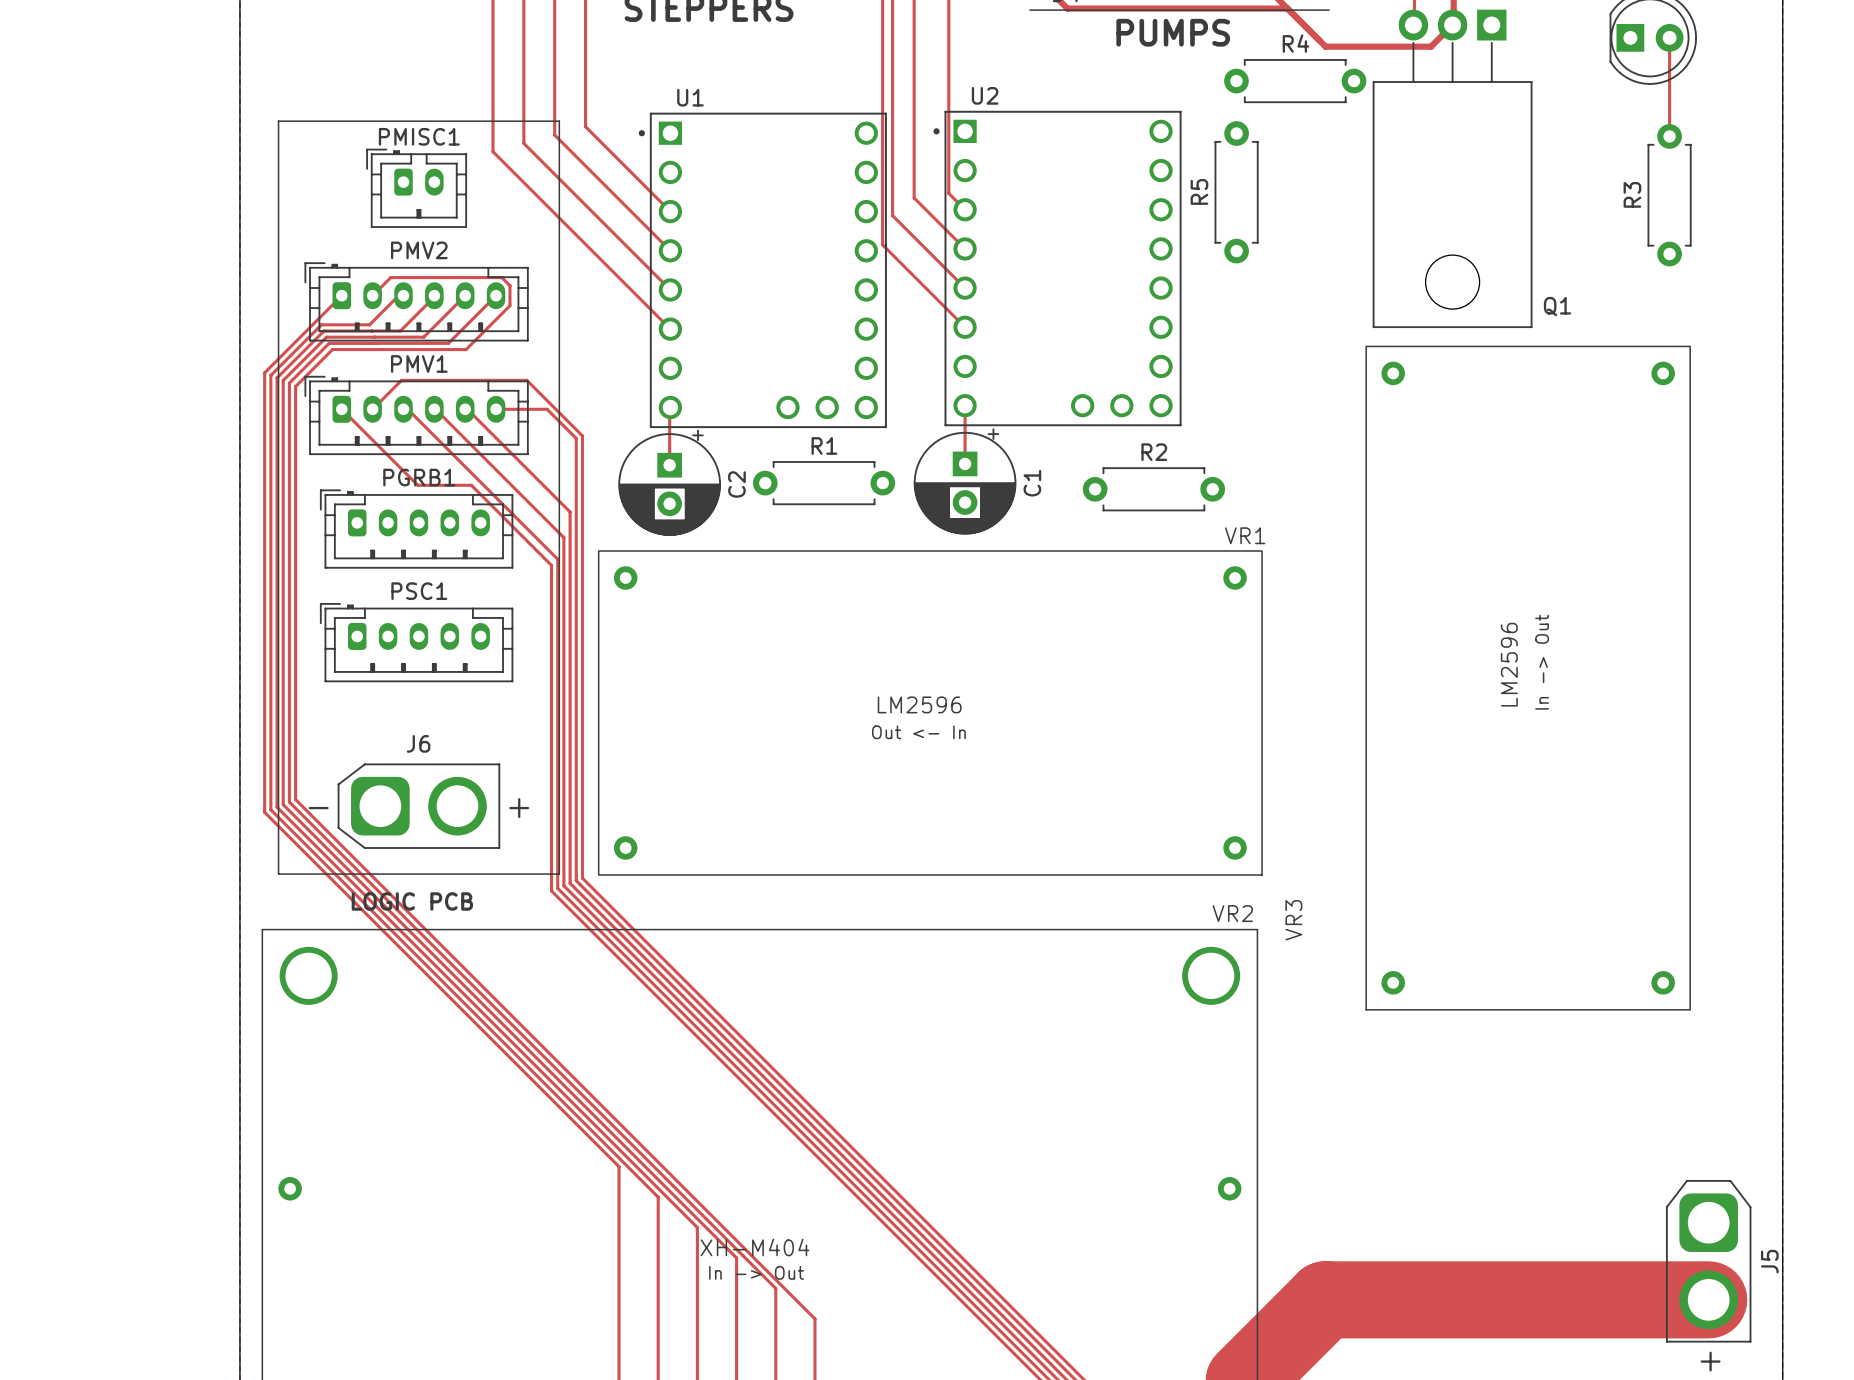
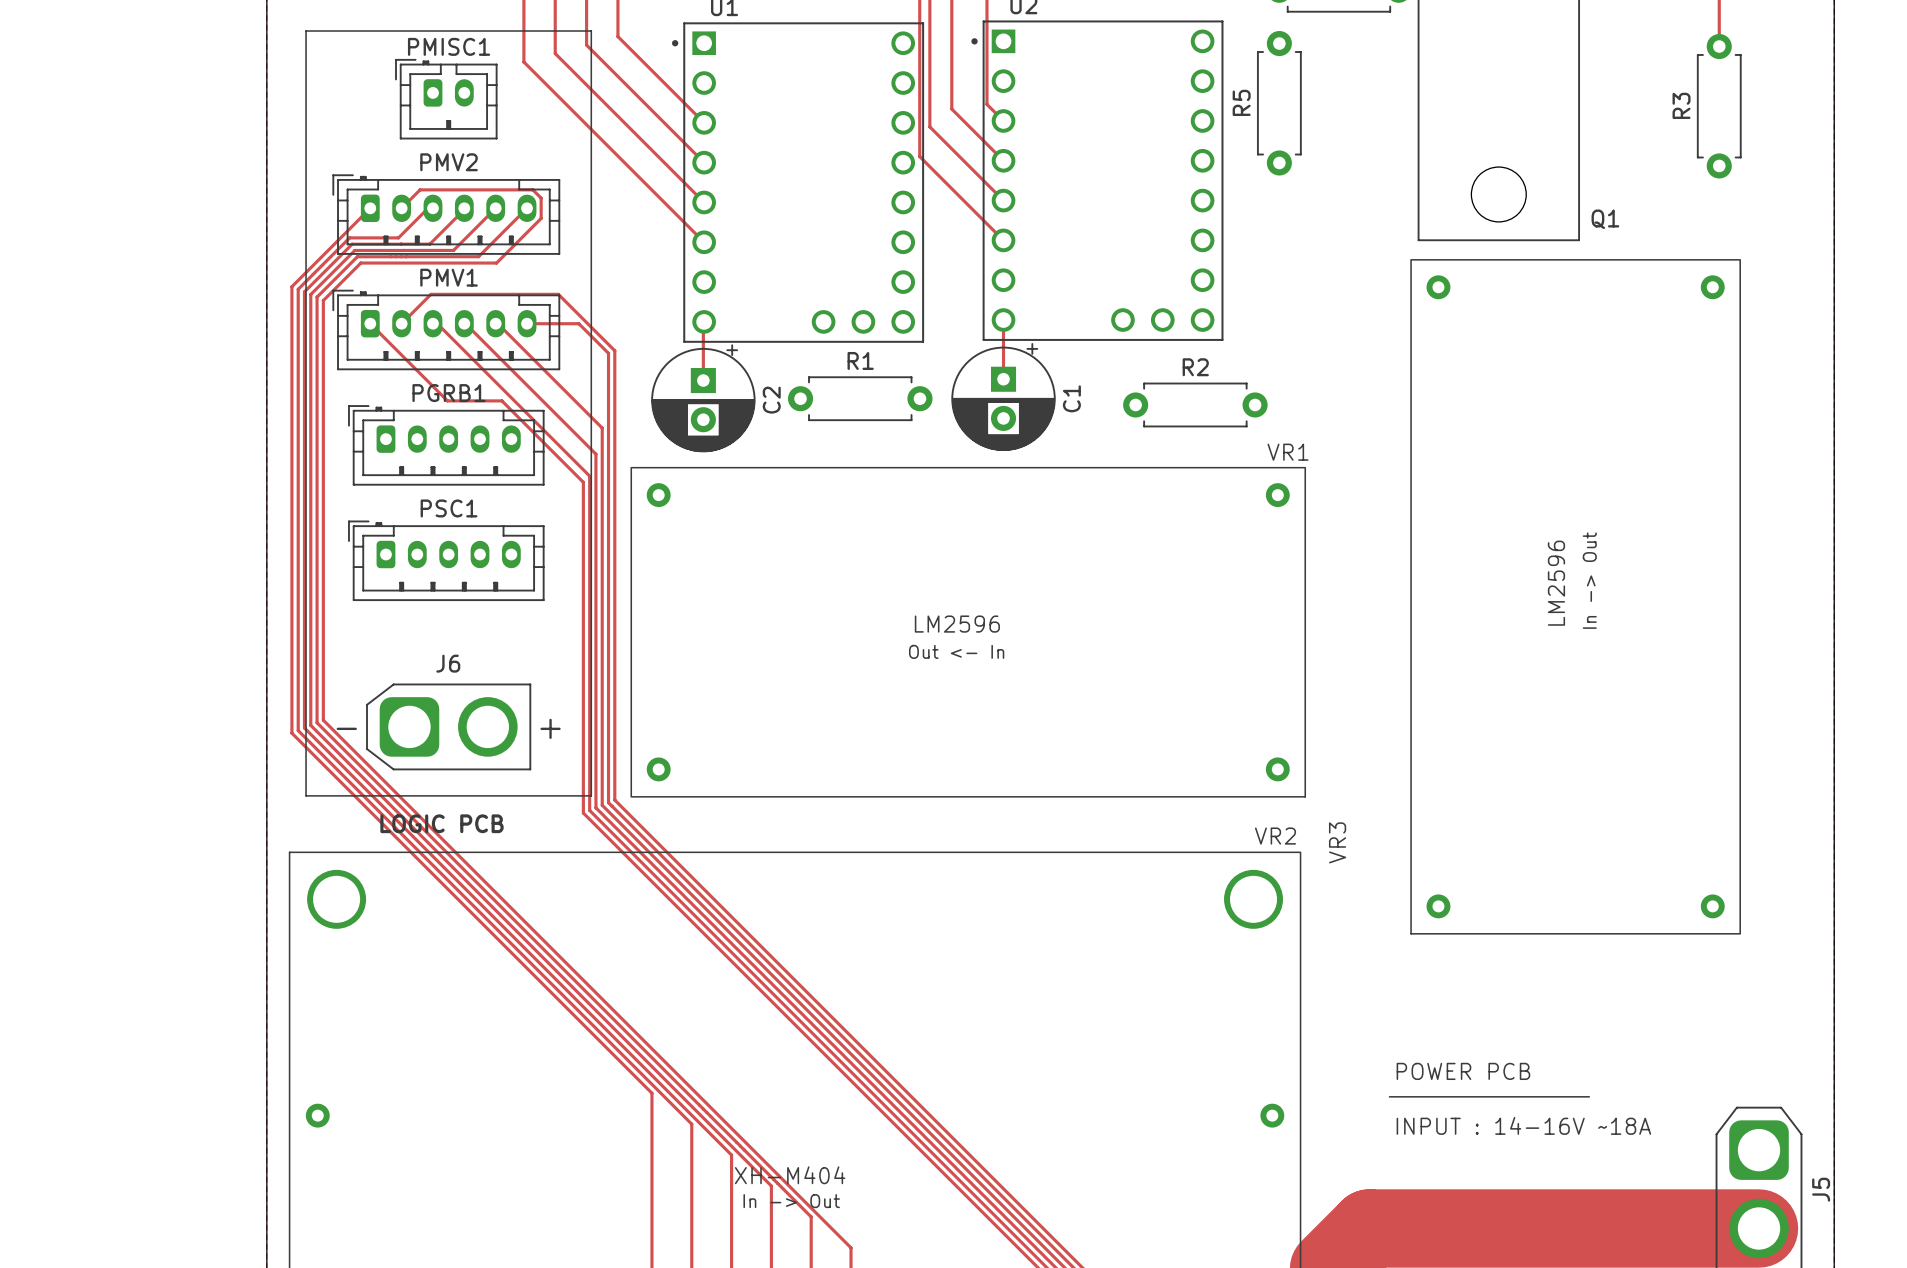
text: none -> POWER PCB (1463, 1071)
line: none -> (1389, 1096) (1589, 1096)
text: none -> INPUT : 14-16V ~18A (1523, 1125)

